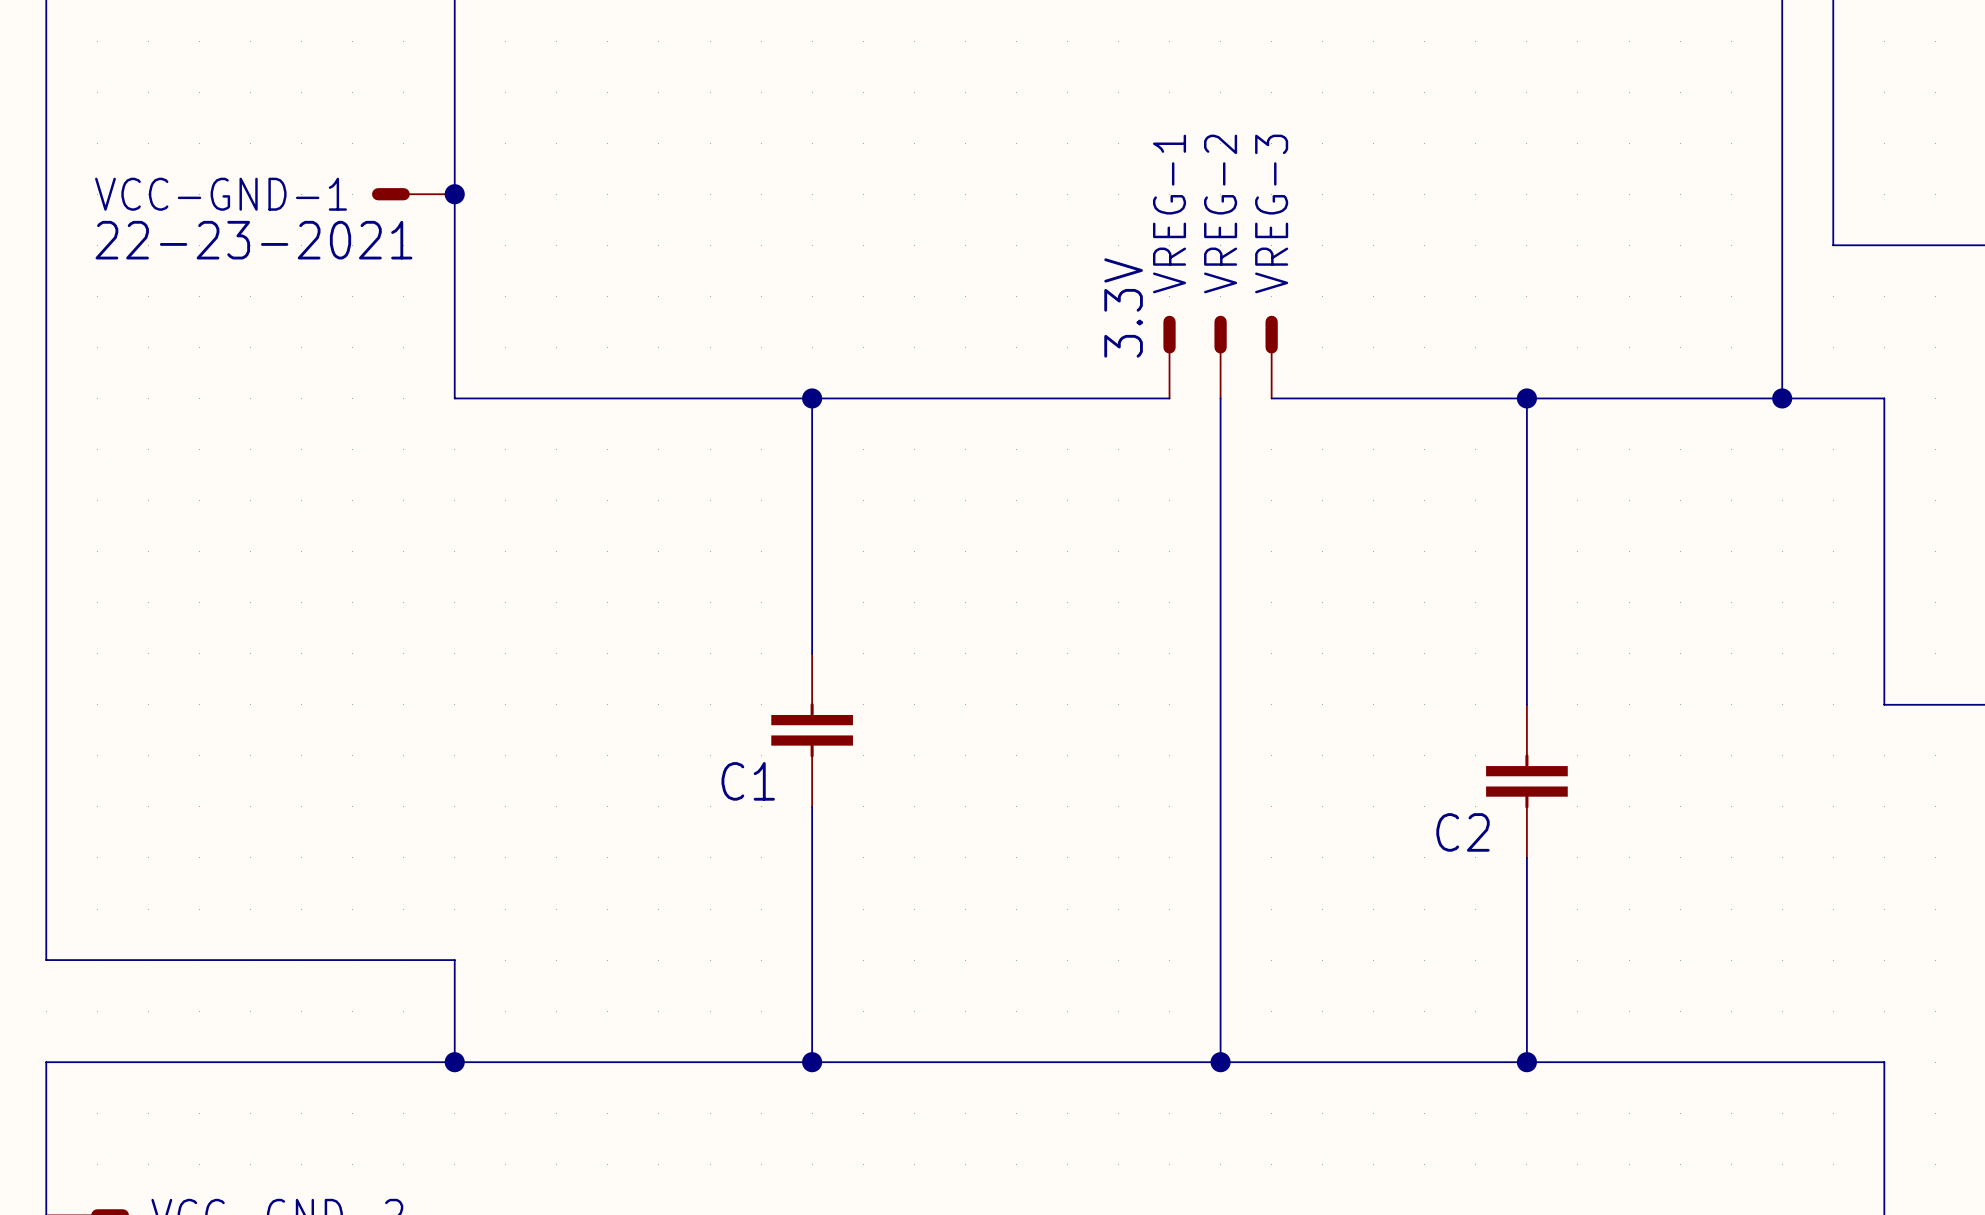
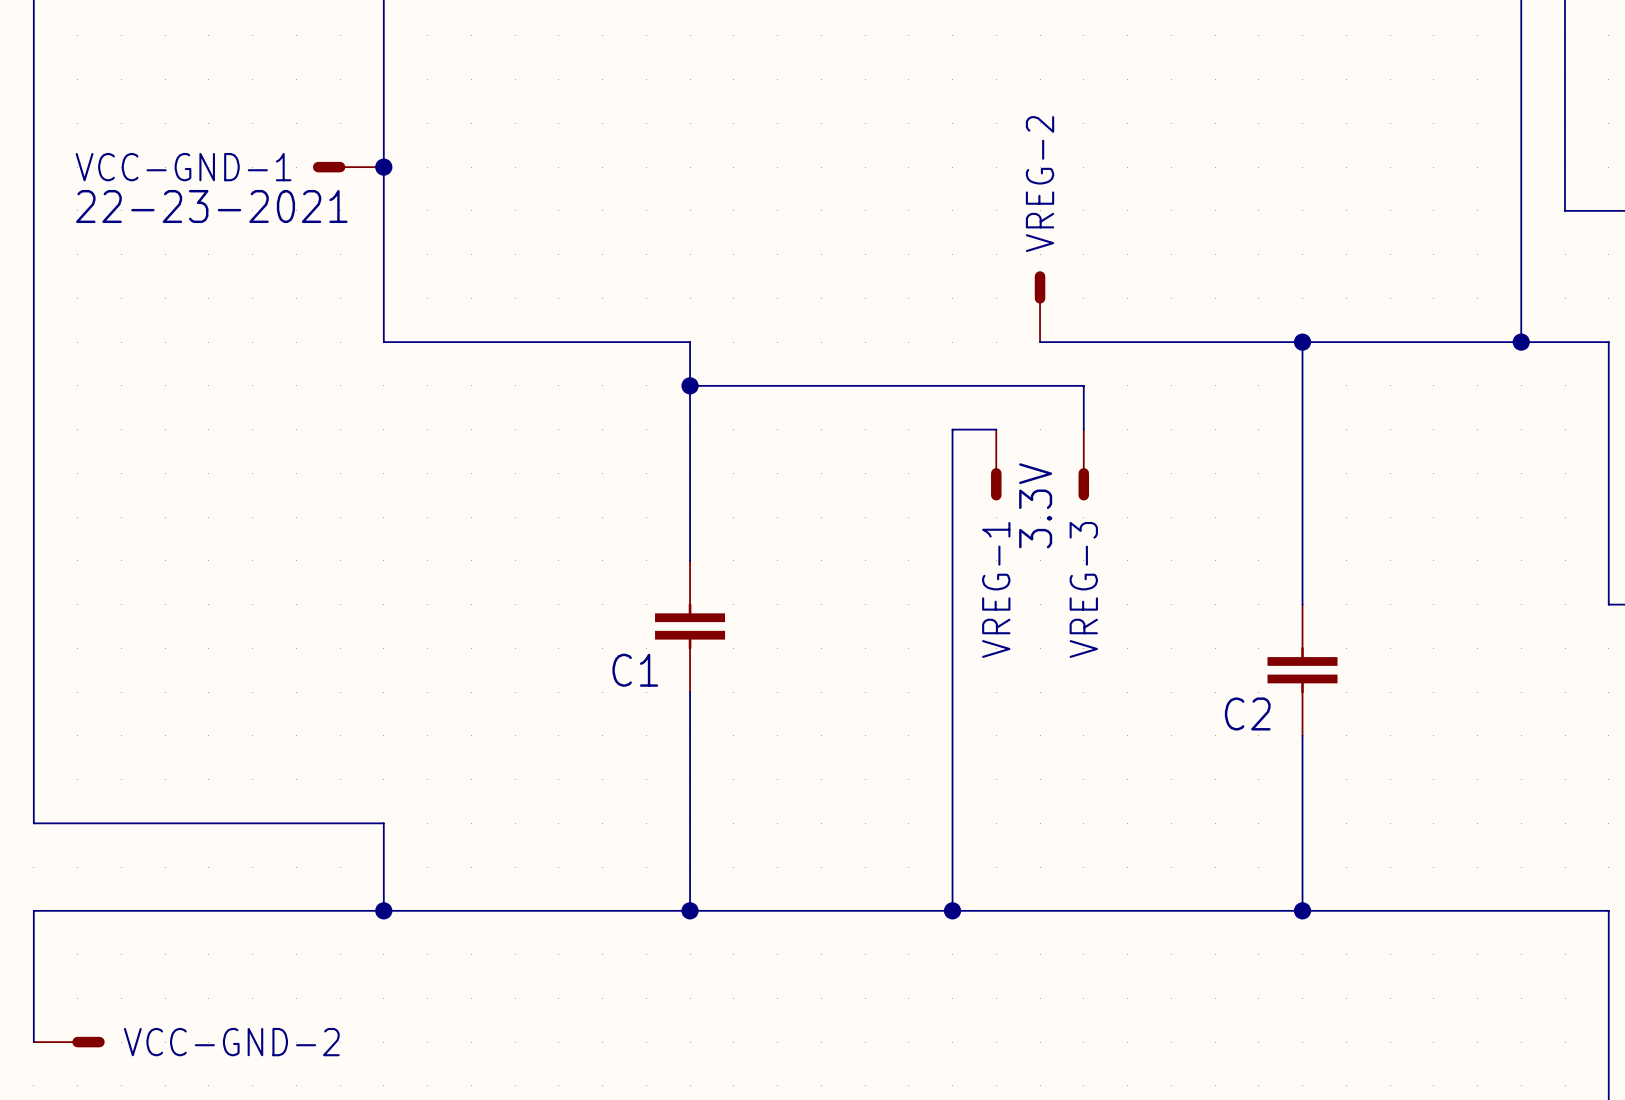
VREG-1 rotation: 0° (1169, 334) -> 180° (996, 484)
VREG-3 rotation: 0° (1271, 334) -> 180° (1083, 484)
VREG-1 position: (1169, 357) -> (996, 465)
VREG-3 position: (1271, 357) -> (1083, 465)
wire: (812, 398) (1169, 398) -> none
junction position: (812, 398) -> (690, 385)
wire: (1220, 398) (1220, 1062) -> (1040, 342) (1083, 342)
wire: none -> (690, 385) (1083, 385) (1083, 429)
wire: none -> (996, 429) (952, 429) (952, 910)
junction position: (1220, 1062) -> (952, 910)

